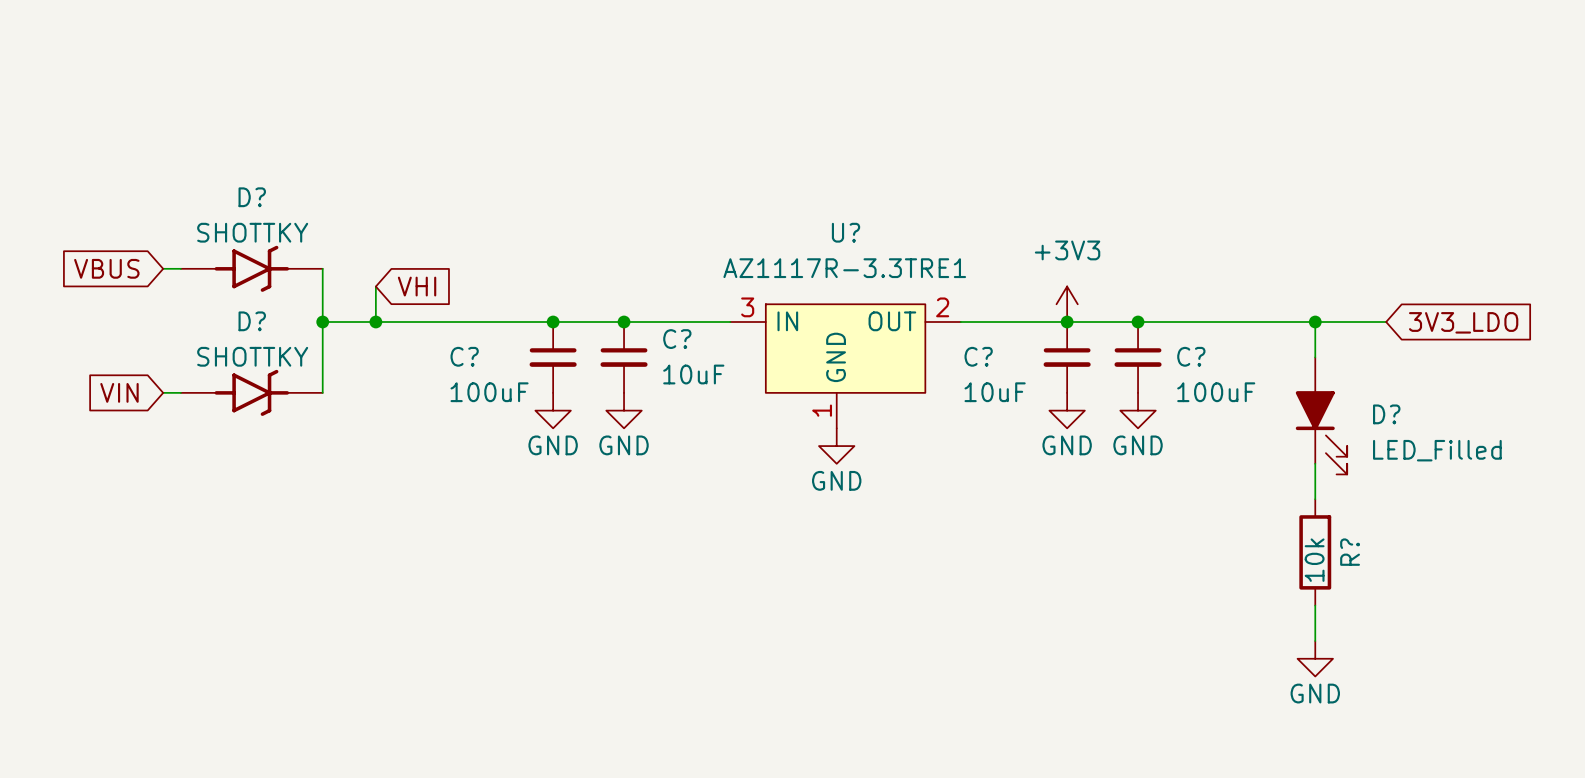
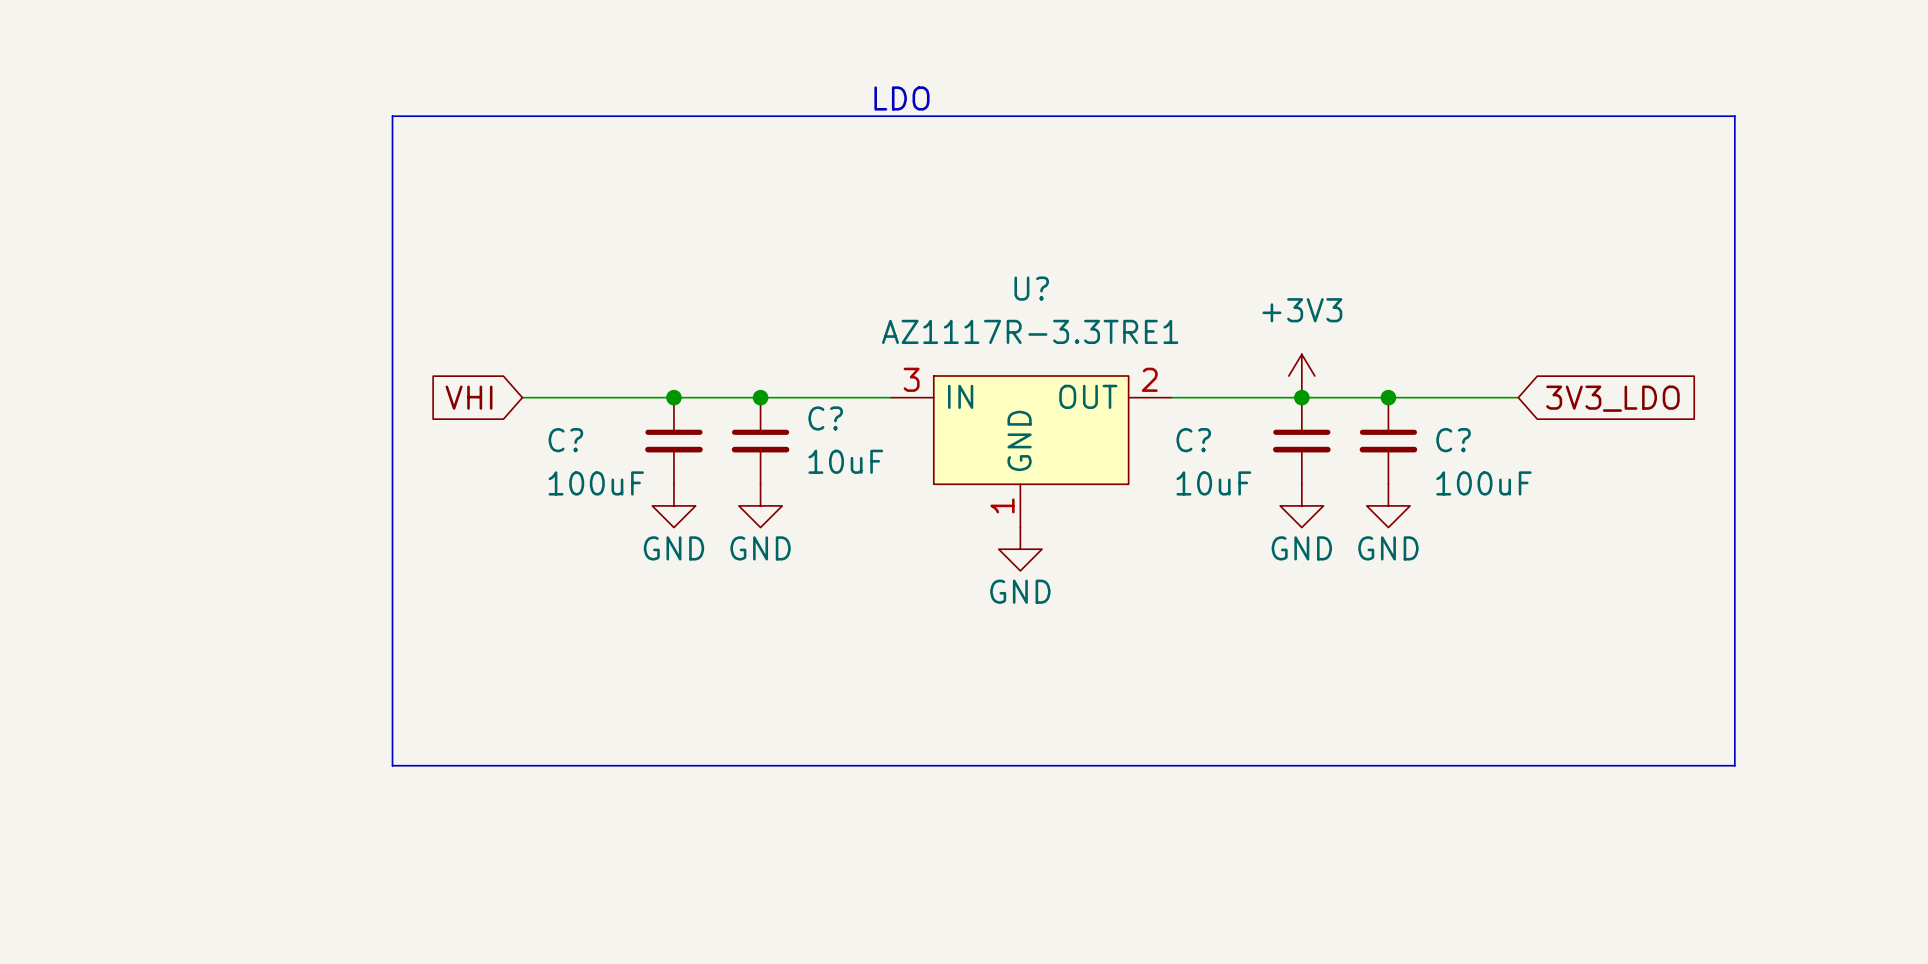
text: none -> LDO (901, 98)
line: none -> (392, 116) (1734, 116) (1734, 765) (392, 765) (392, 116)
global label: VBUS (106, 268) -> none
wire: (163, 268) (180, 268) -> none
D?: SHOTTKY (251, 268) -> none
wire: (375, 286) (375, 321) -> none
global label rotation: 0° (417, 286) -> 180° (469, 397)
wire: (322, 321) (429, 321) -> none
junction: (322, 321) -> none
junction: (375, 321) -> none
wire: (1244, 321) (1386, 321) -> none
wire: (1315, 321) (1315, 357) -> none
junction: (1315, 321) -> none
global label position: 3V3_LDO (1463, 322) -> 3V3_LDO (1612, 398)
global label: VIN (119, 392) -> none
wire: (163, 392) (180, 392) -> none
D?: SHOTTKY (251, 392) -> none
D?: LED_Filled (1321, 415) -> none
wire: (1315, 463) (1315, 499) -> none
R?: 10k (1315, 552) -> none
wire: (1315, 605) (1315, 641) -> none
power symbol: GND (1315, 658) -> none

